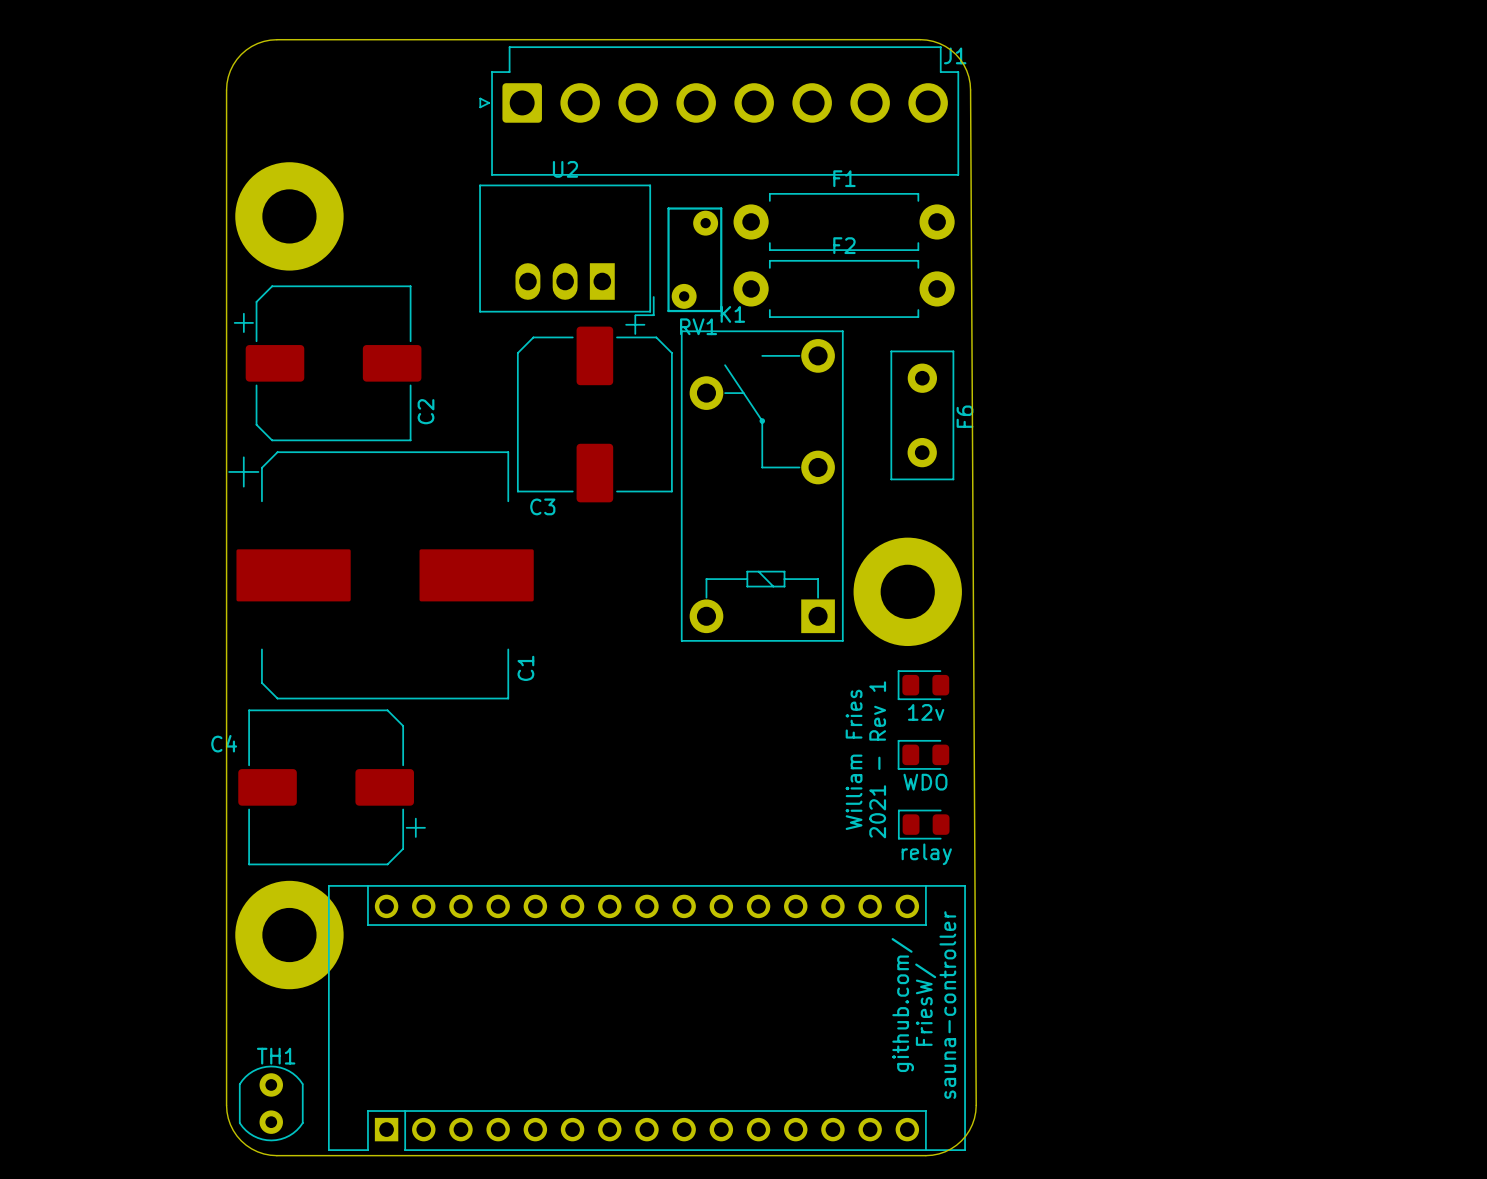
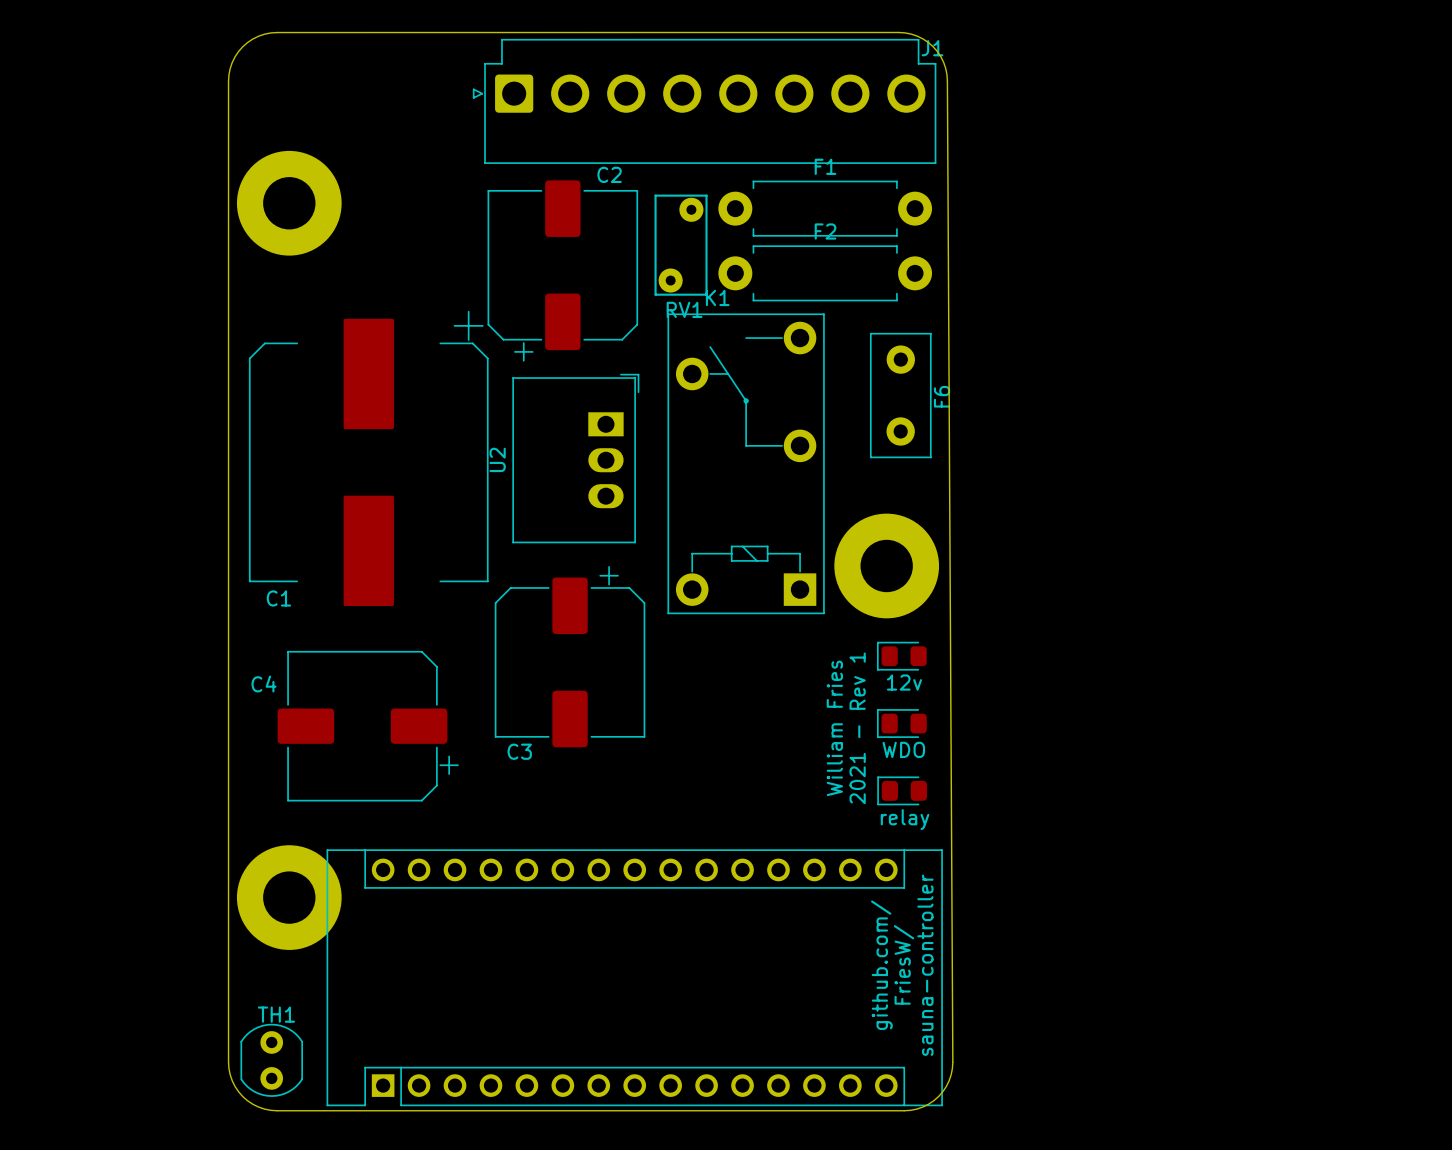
U2 rotation: 0° (566, 250) -> 90° counterclockwise (575, 458)
U2 position: (566, 250) -> (575, 458)
C2 rotation: 0° (327, 363) -> 90° counterclockwise (562, 270)
C2 position: (327, 363) -> (562, 270)
C3 position: (594, 408) -> (570, 656)
C1 rotation: 0° (381, 575) -> 90° clockwise (368, 458)
C4 position: (332, 787) -> (368, 726)

